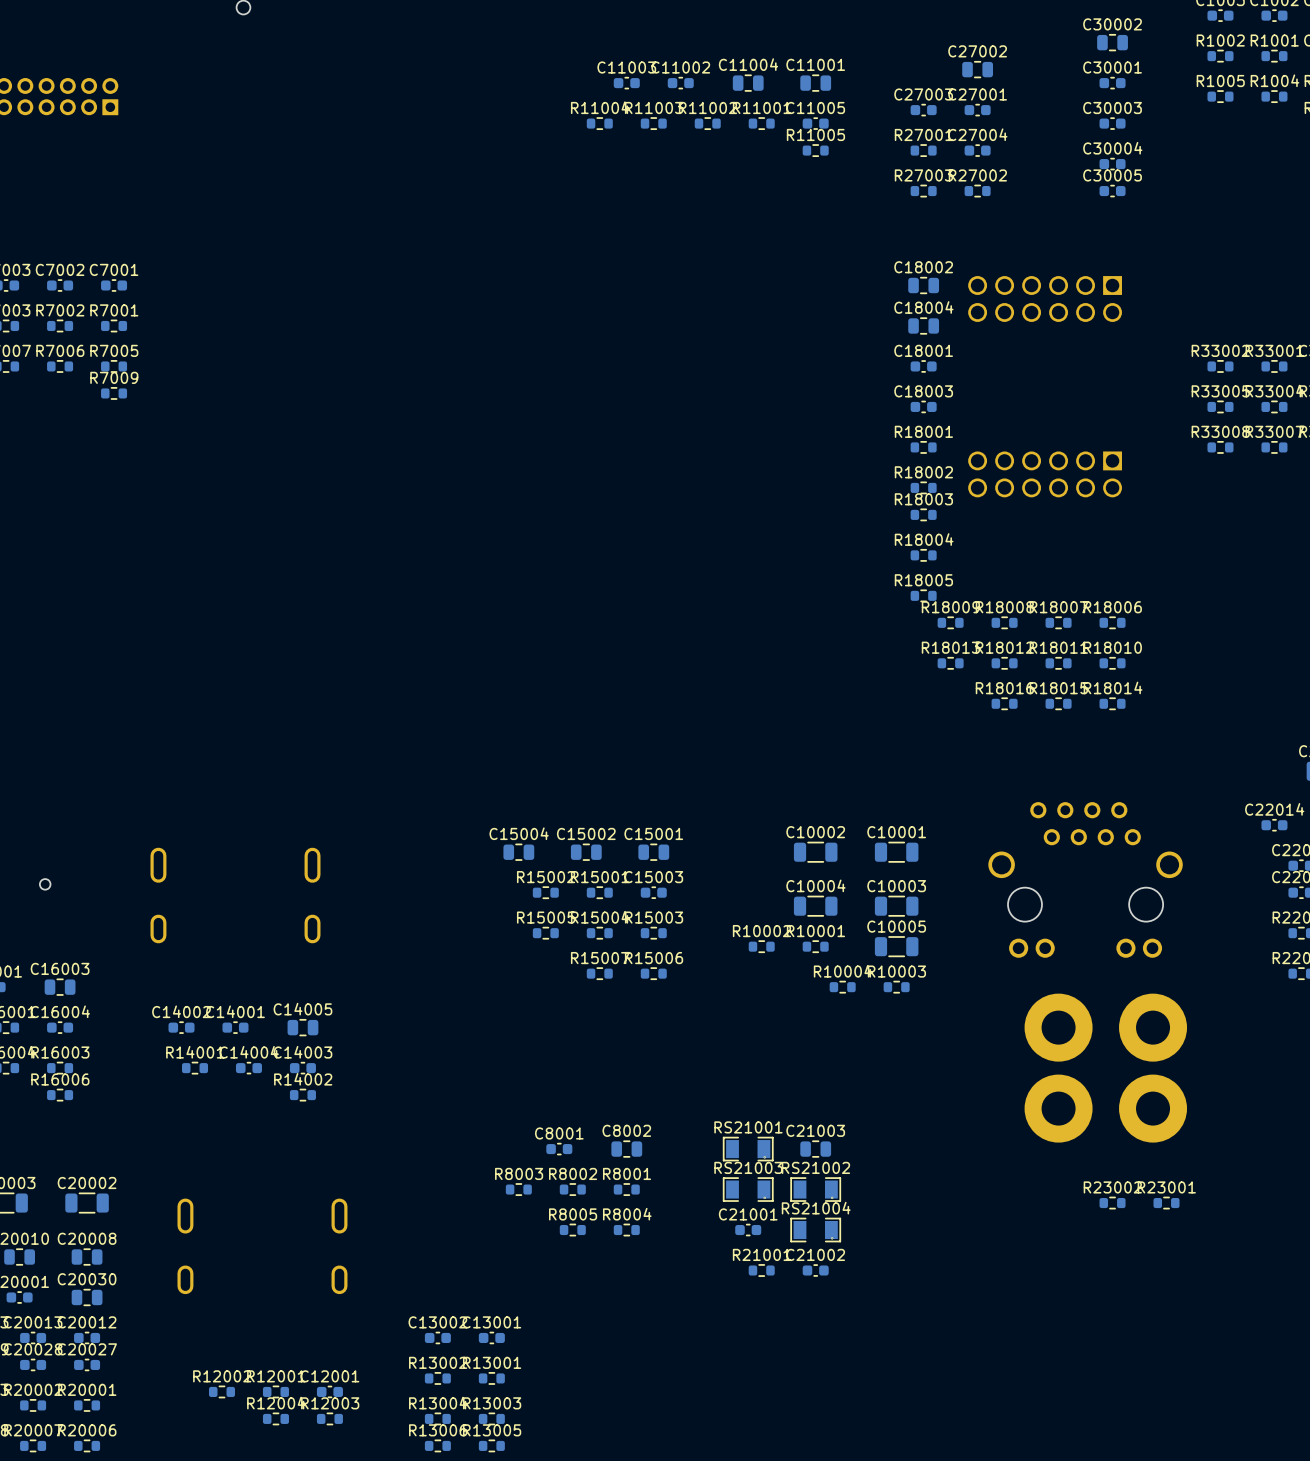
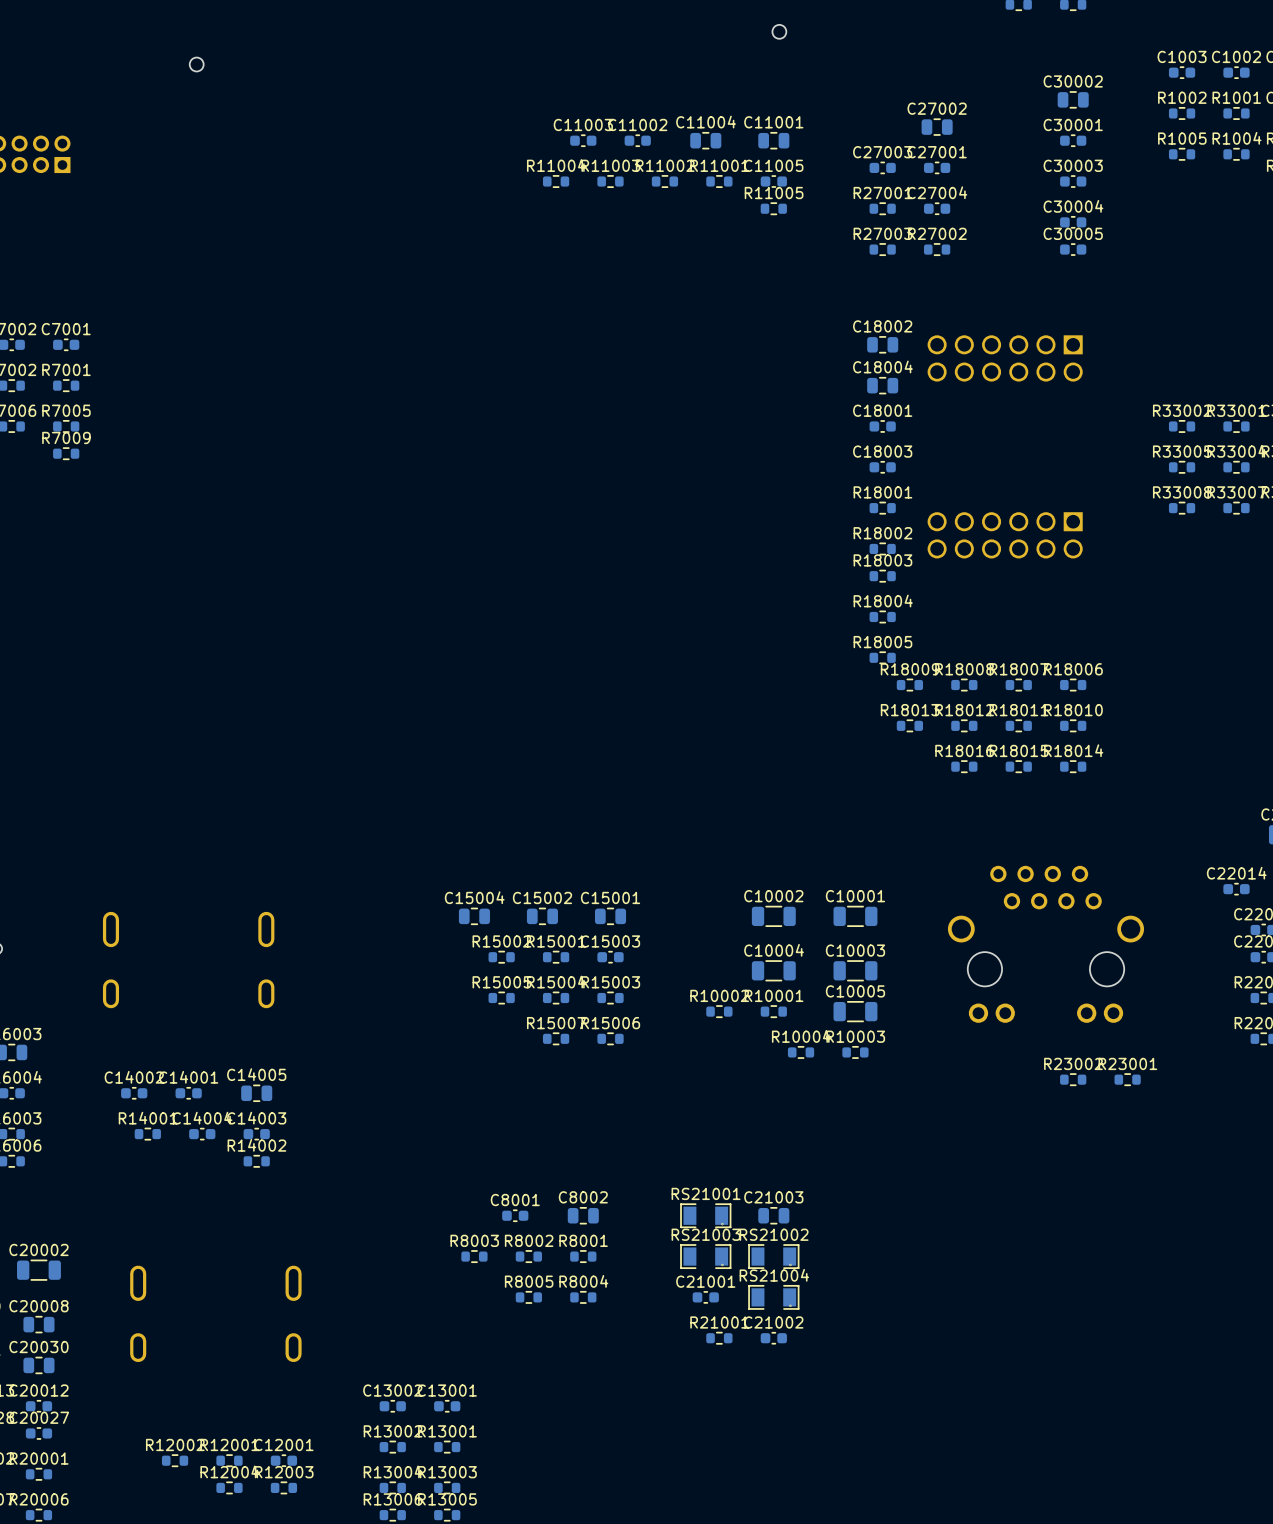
part: (1058, 1027) -> none
part: (1153, 1027) -> none
part: (1058, 1108) -> none
part: (1153, 1108) -> none
R23002 position: (1112, 1203) -> (1073, 1079)
R23001 position: (1166, 1203) -> (1127, 1079)

